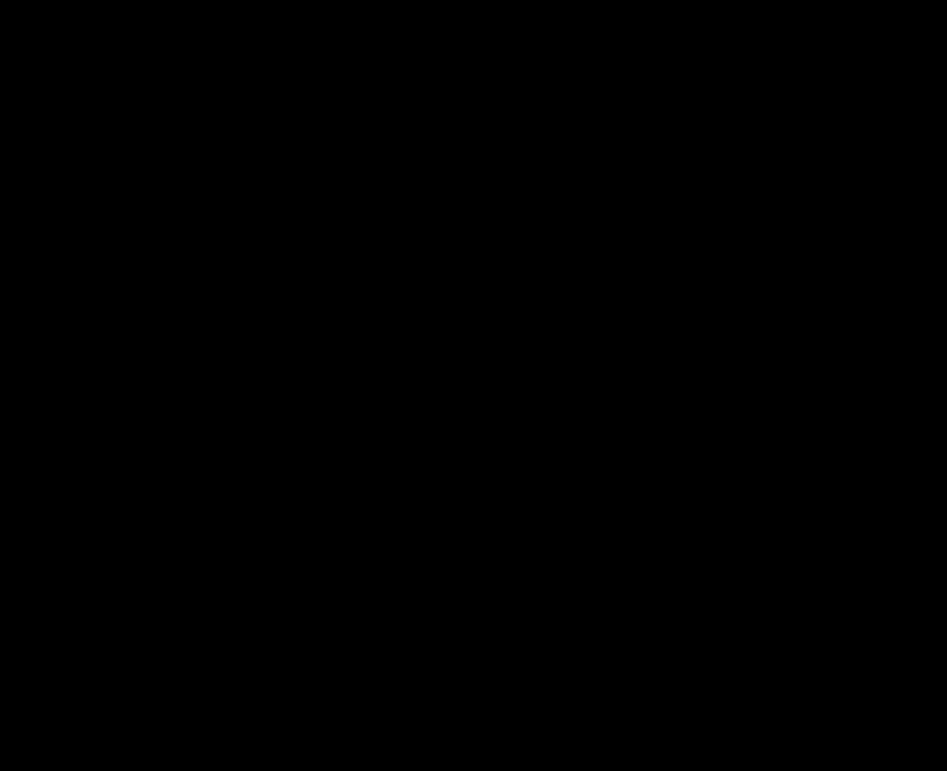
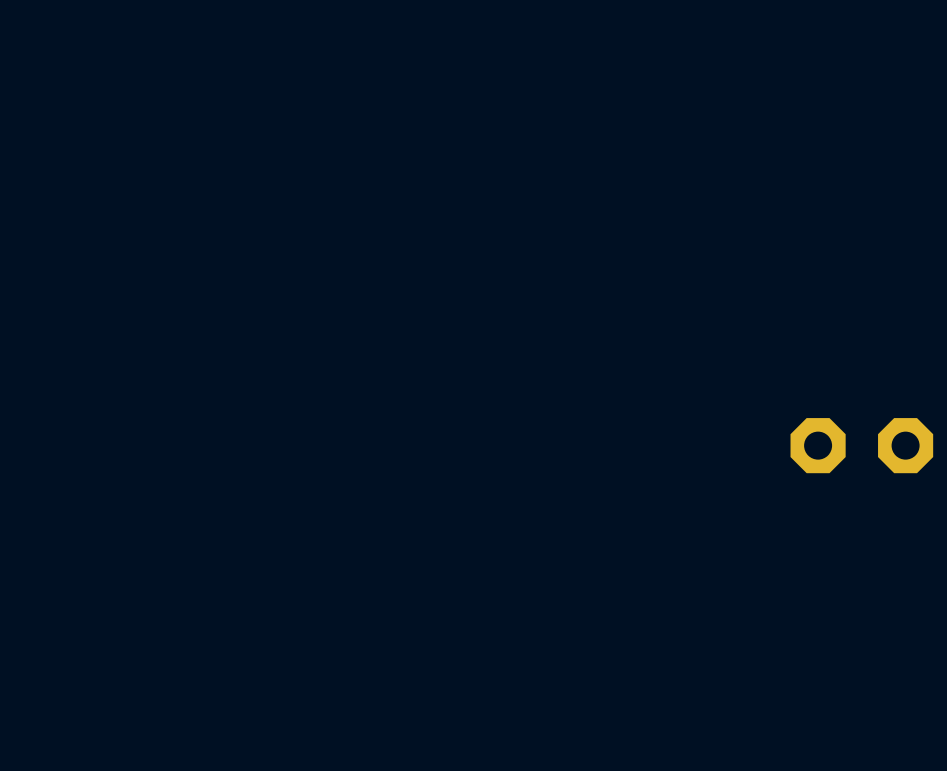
part: none -> (861, 445)

